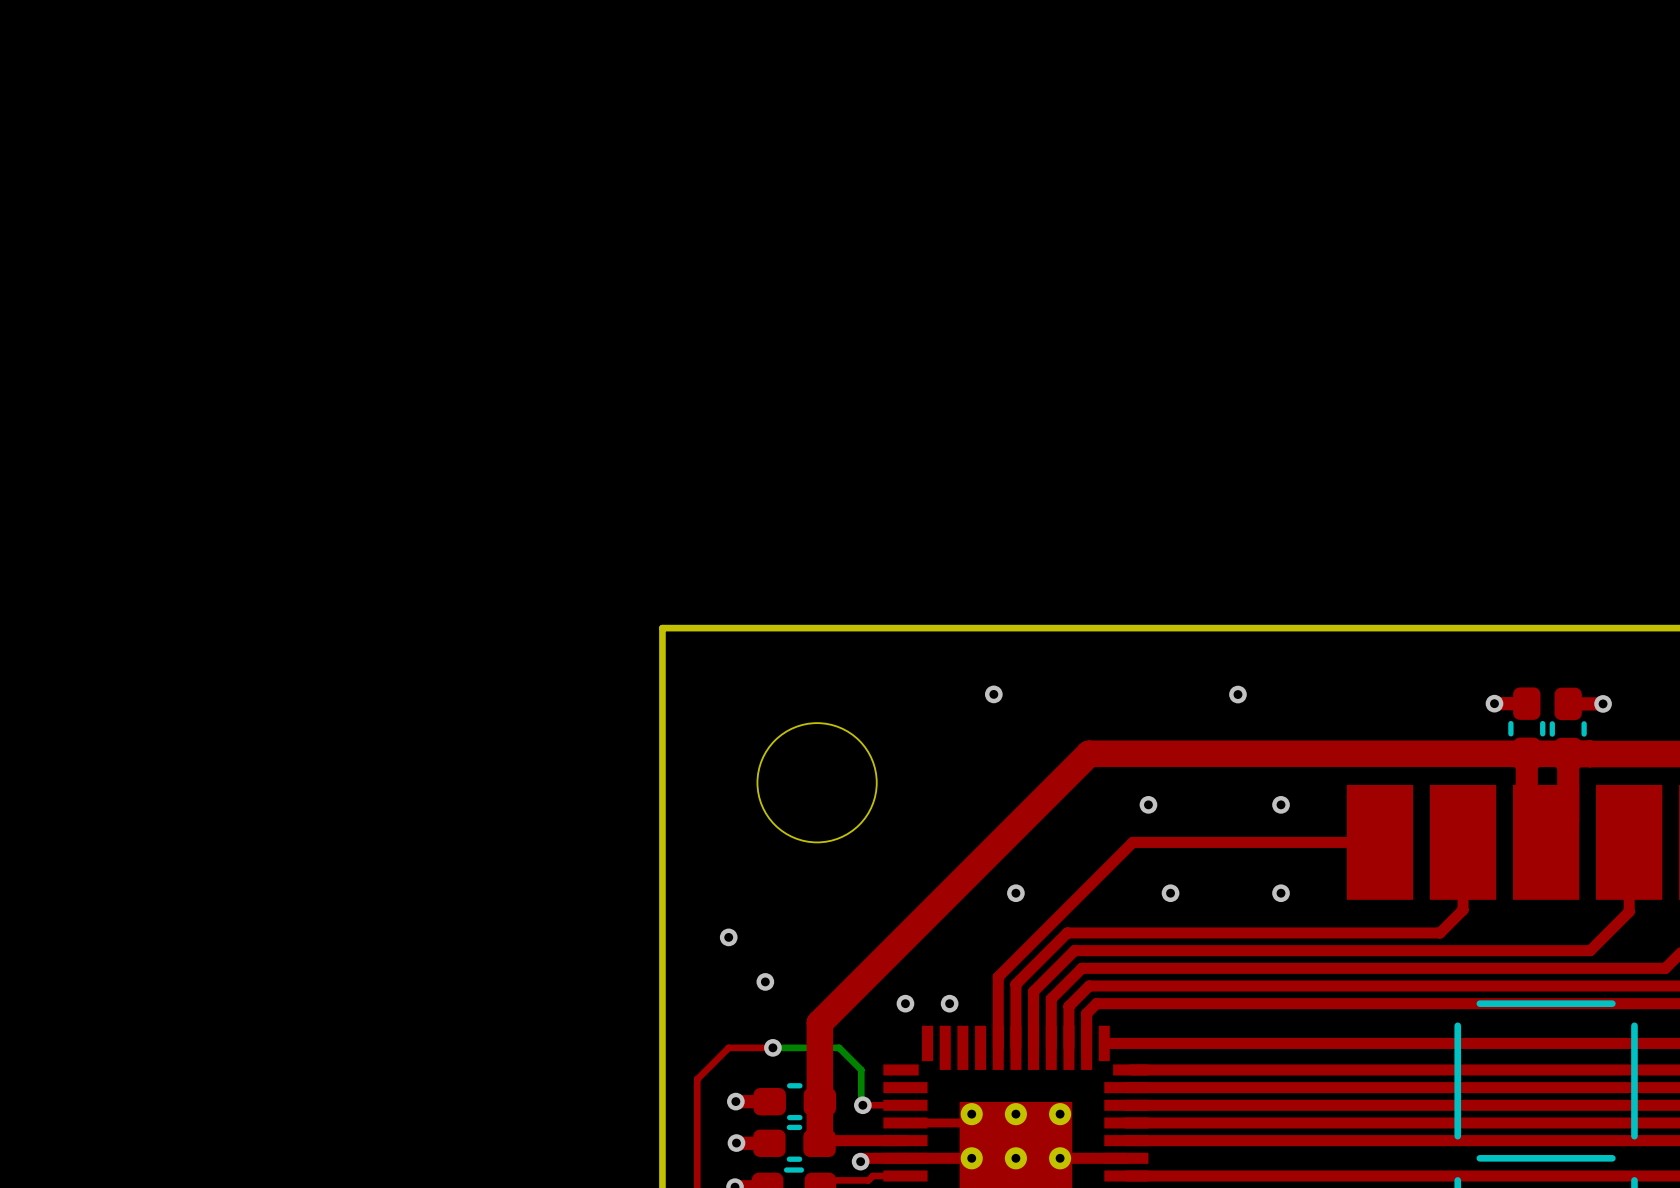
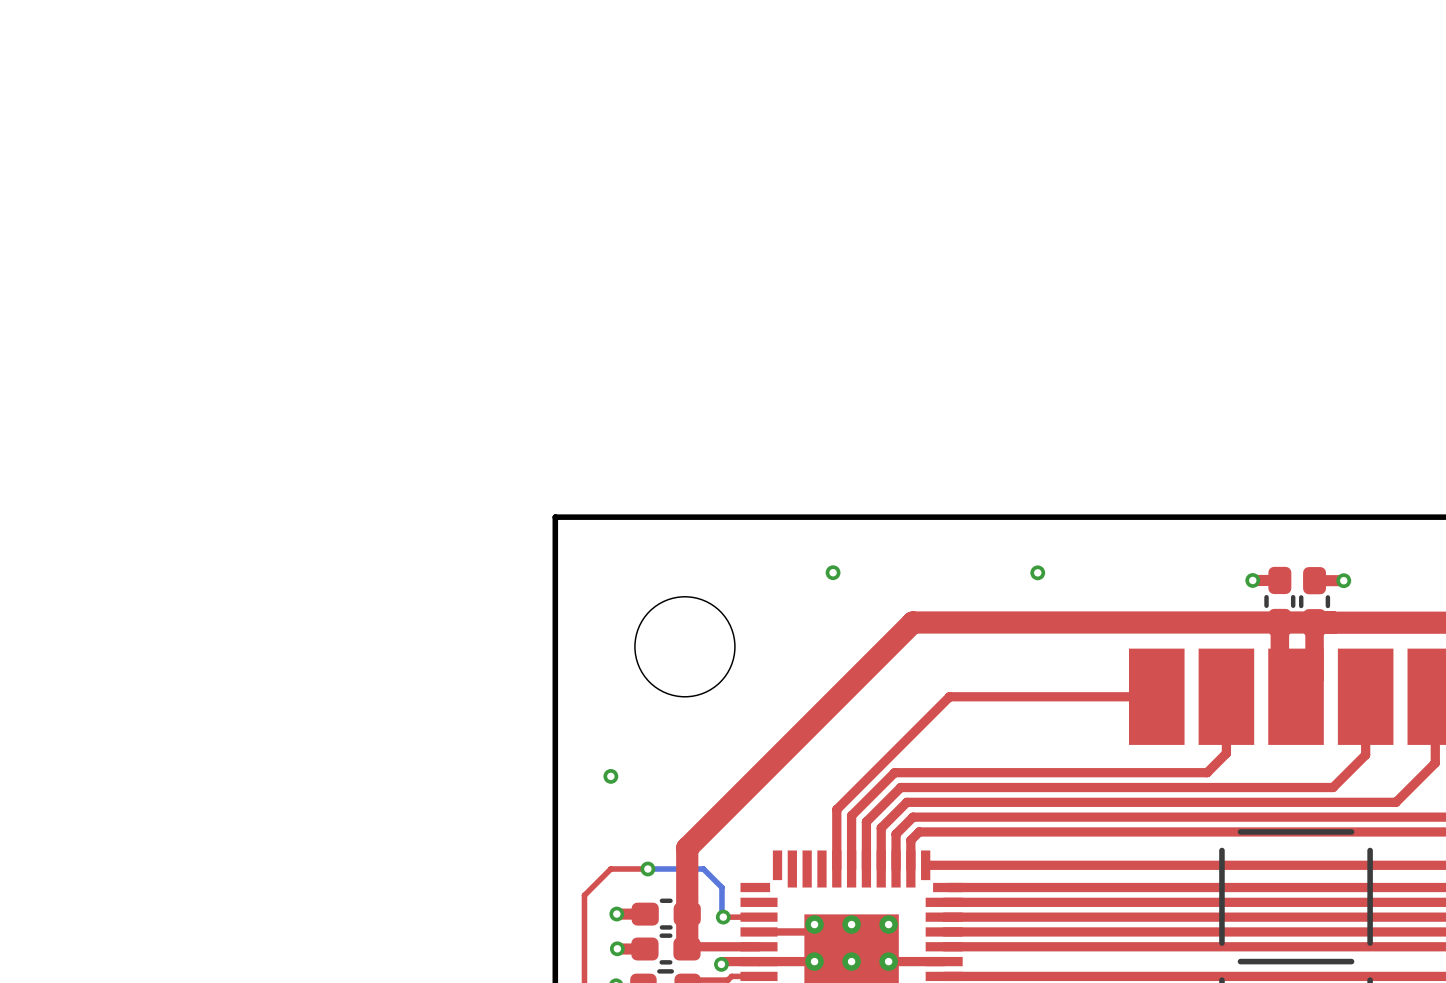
via: (1148, 804) -> none
via: (1281, 804) -> none
via: (1015, 893) -> none
via: (1170, 893) -> none
via: (1281, 893) -> none
via: (765, 981) -> none
via: (905, 1003) -> none
via: (949, 1003) -> none

